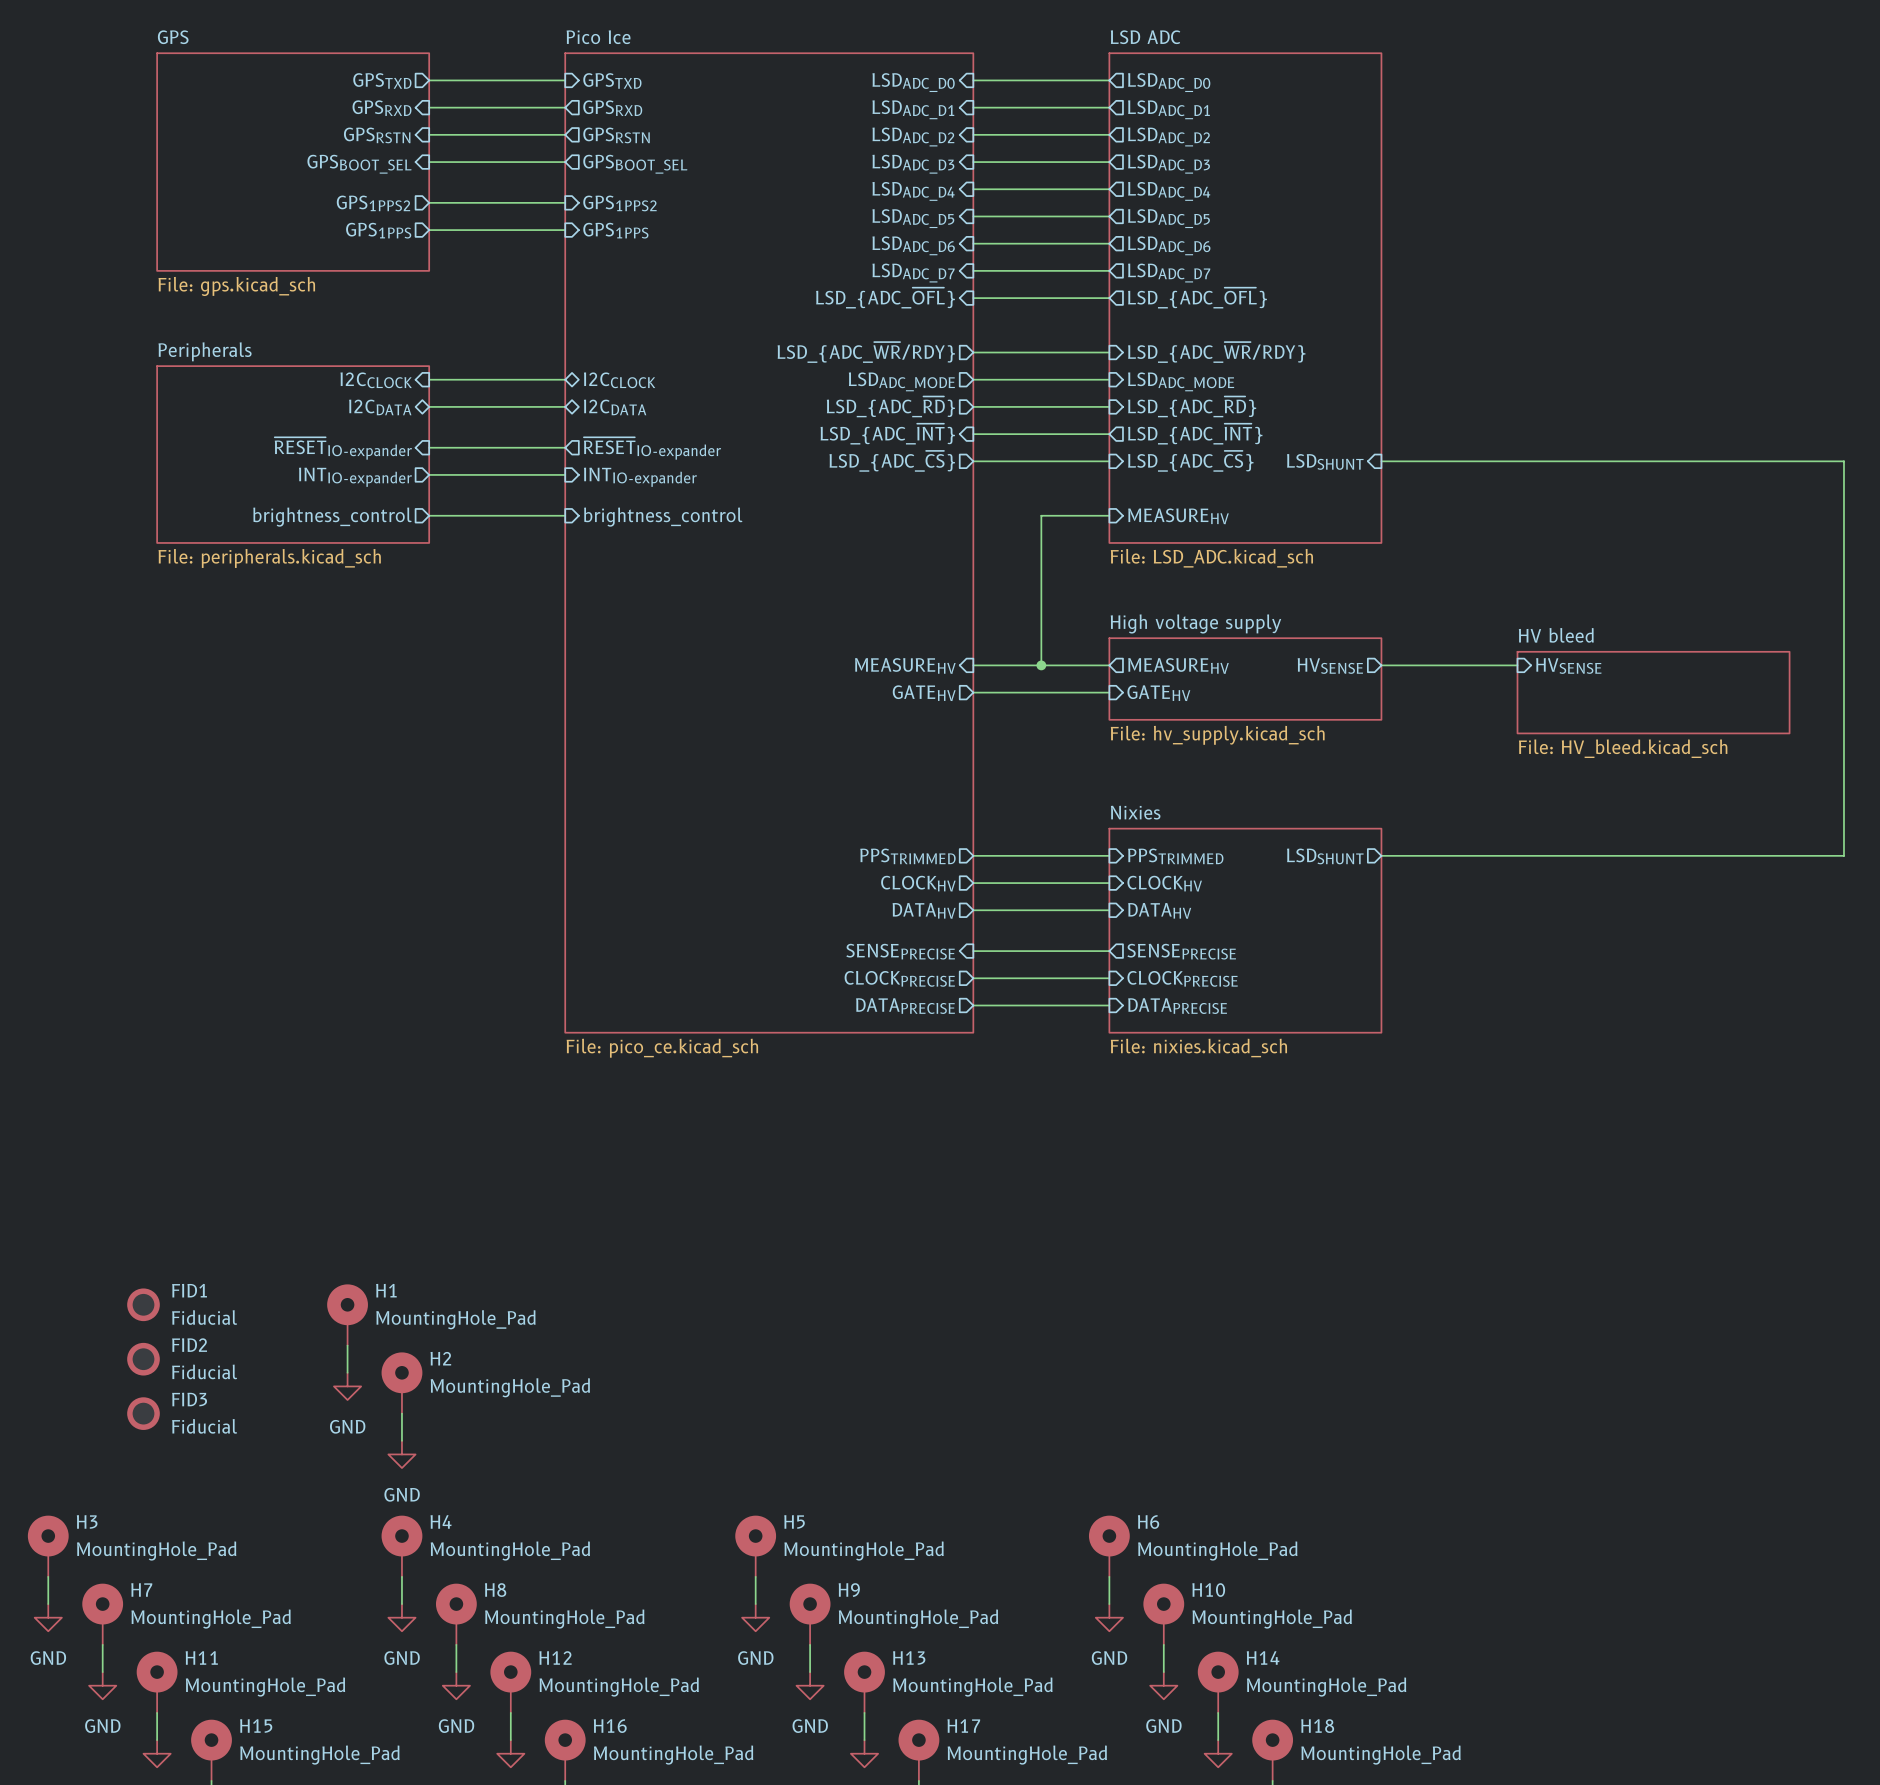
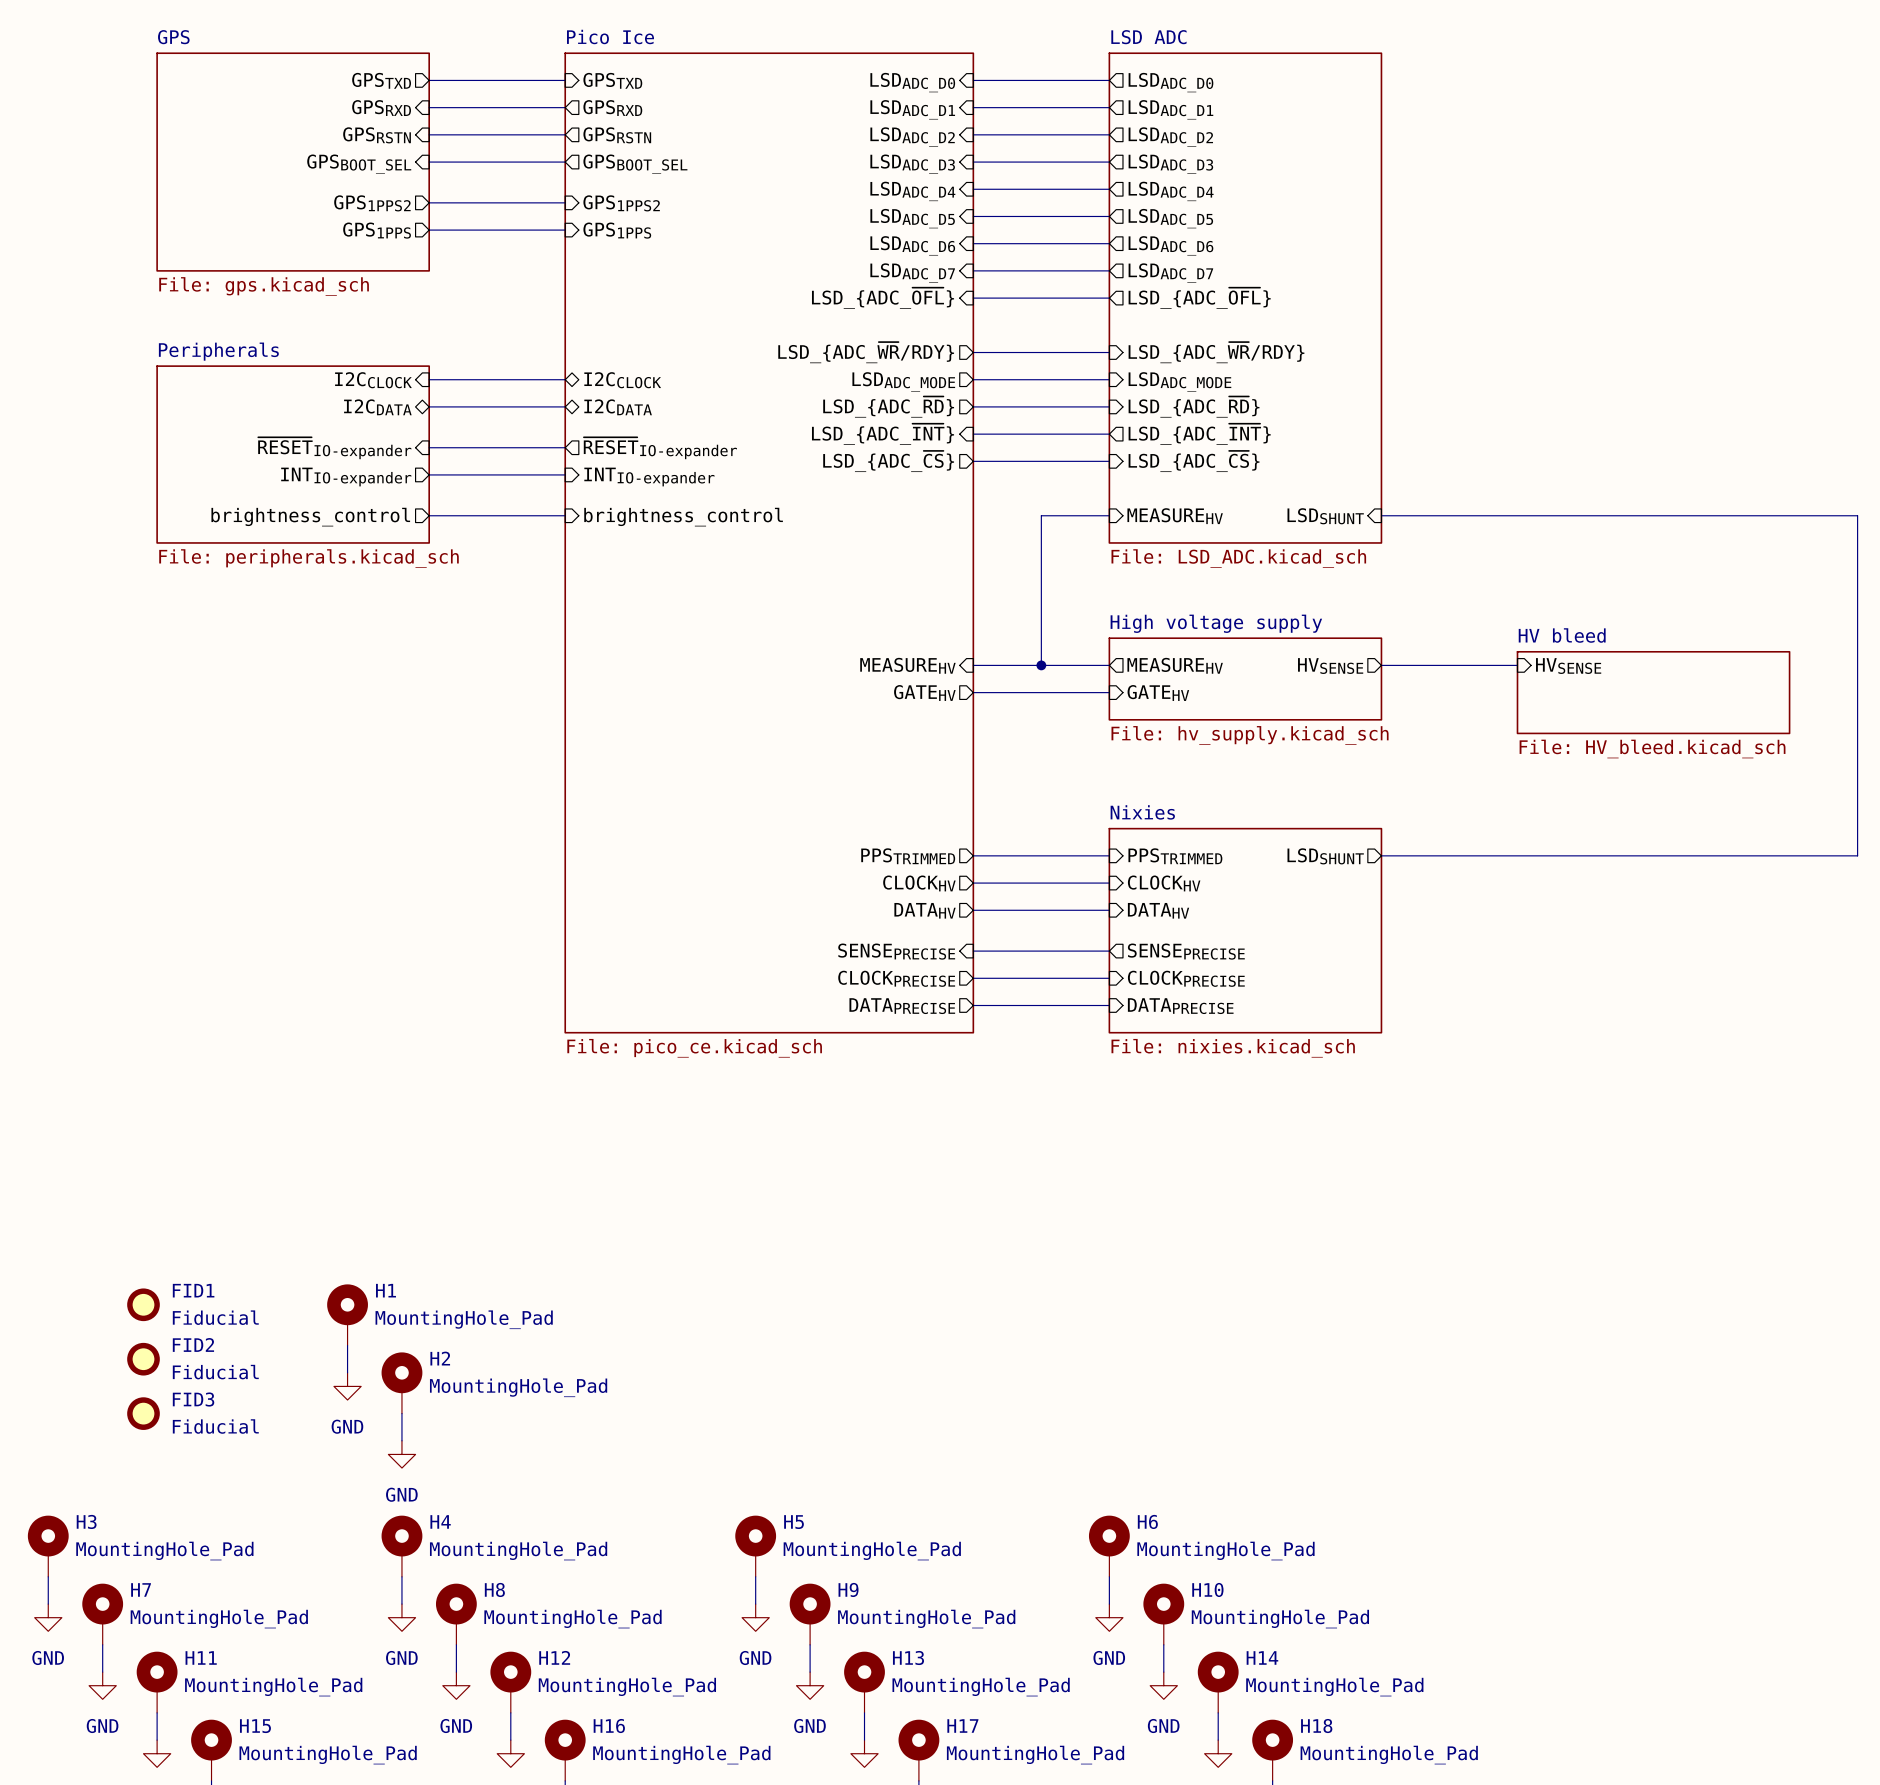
sheet pin position: LSDSHUNT (1325, 461) -> LSDSHUNT (1325, 516)
wire: (1381, 461) (1843, 461) (1843, 855) -> (1381, 515) (1857, 515) (1857, 855) (1843, 855)

